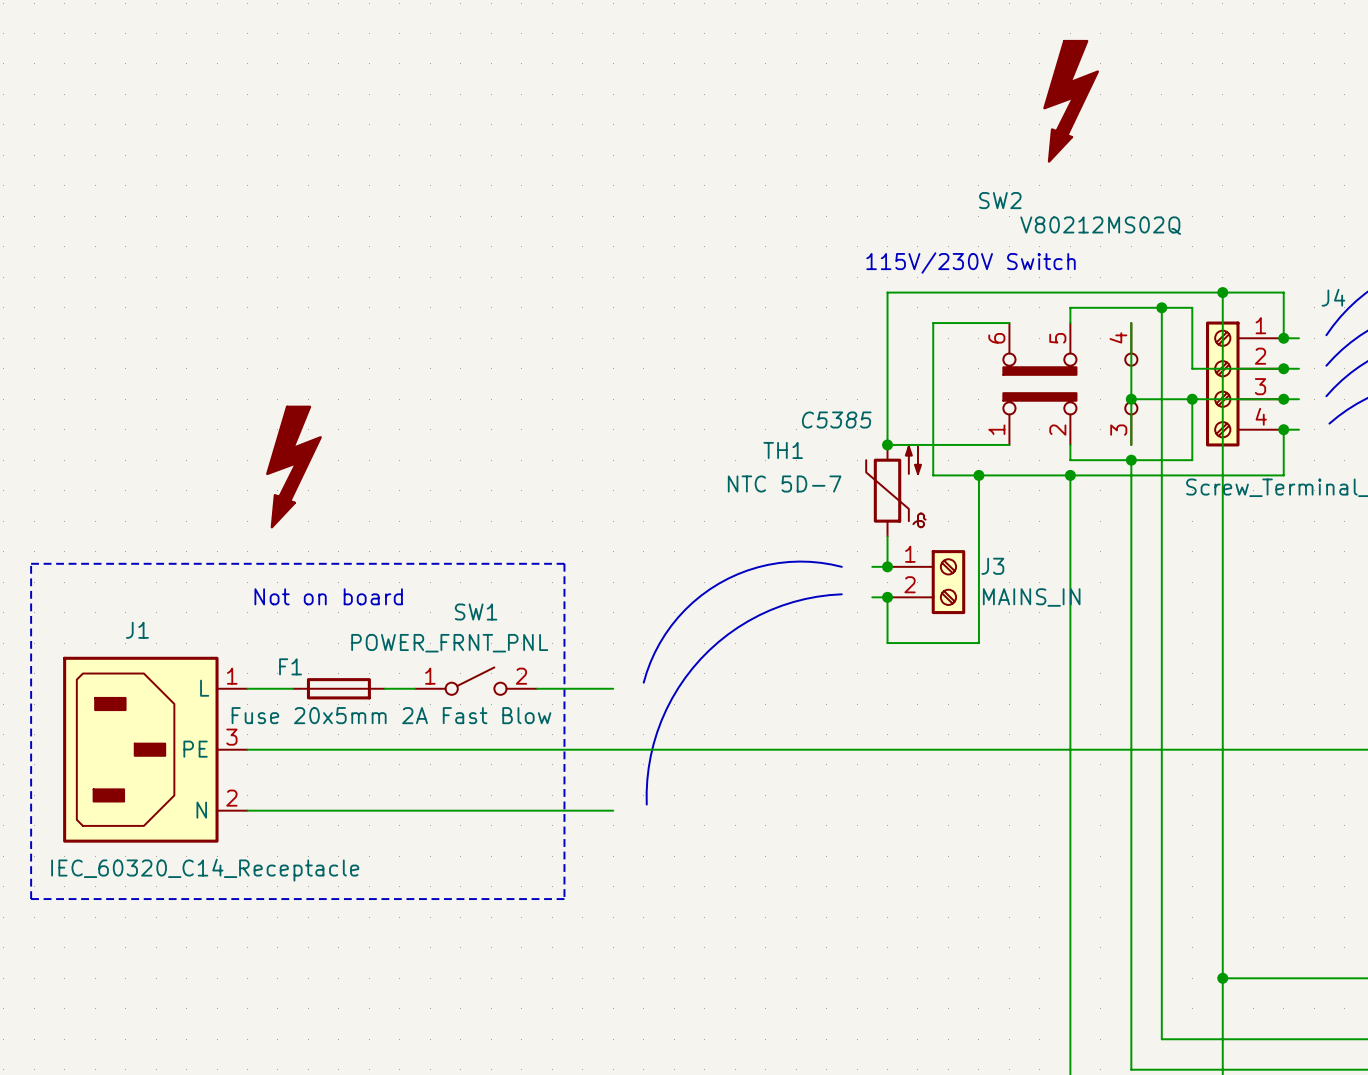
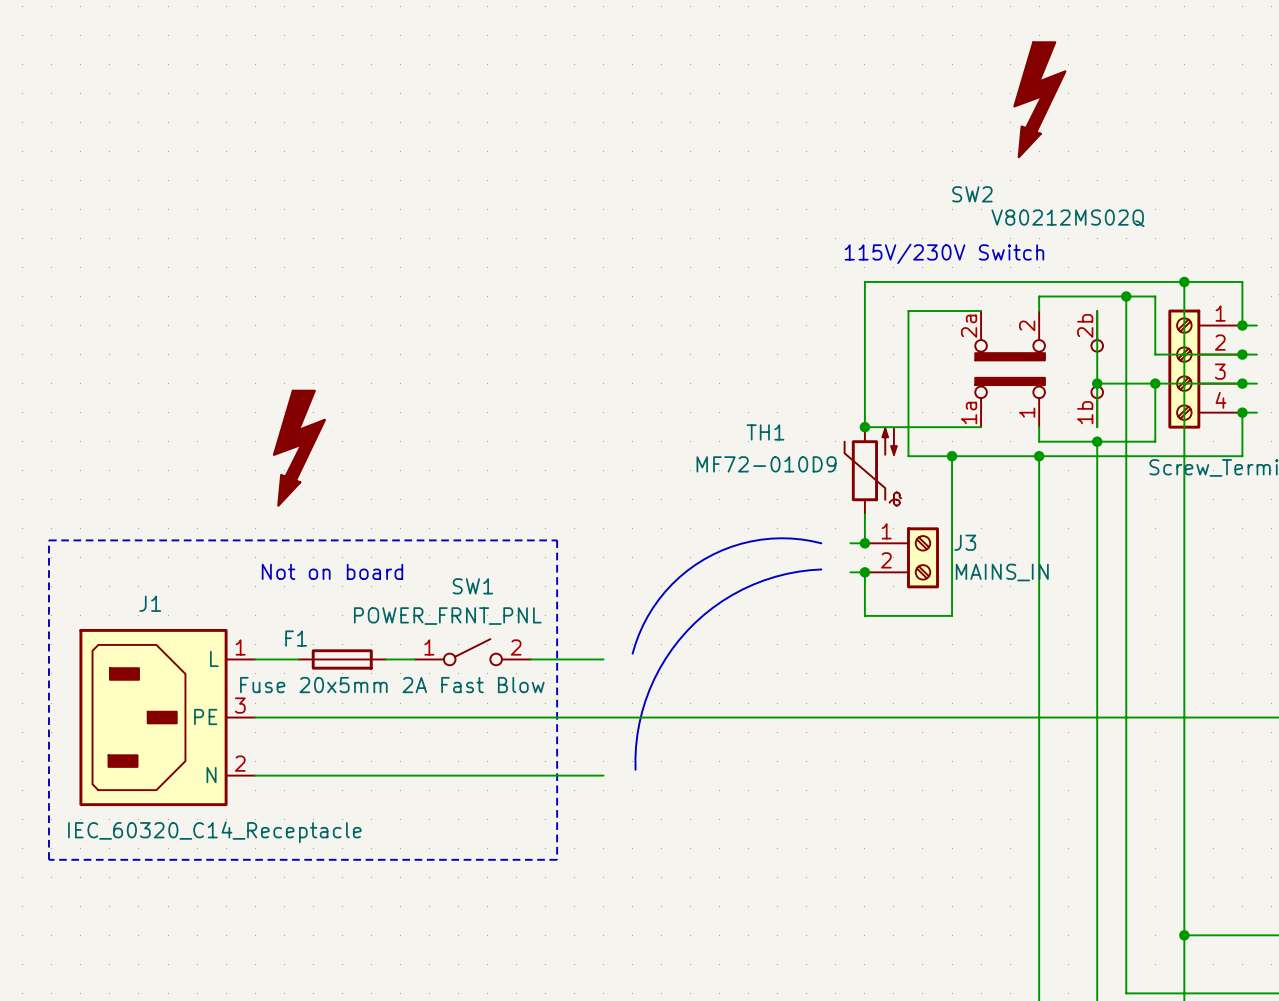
SW2 pin number: 4 (1118, 337) -> 2b (1085, 325)
SW2 pin number: 6 (996, 338) -> 2a (969, 326)
SW2 pin number: 5 (1057, 338) -> 2 (1027, 325)
TH1 text: C5385 (836, 419) -> none
SW2 pin number: 1 (996, 429) -> 1a (969, 412)
SW2 pin number: 2 (1057, 430) -> 1 (1027, 412)
SW2 pin number: 3 (1118, 430) -> 1b (1085, 412)
TH1 value: NTC 5D-7 (784, 484) -> MF72-010D9 (766, 464)

